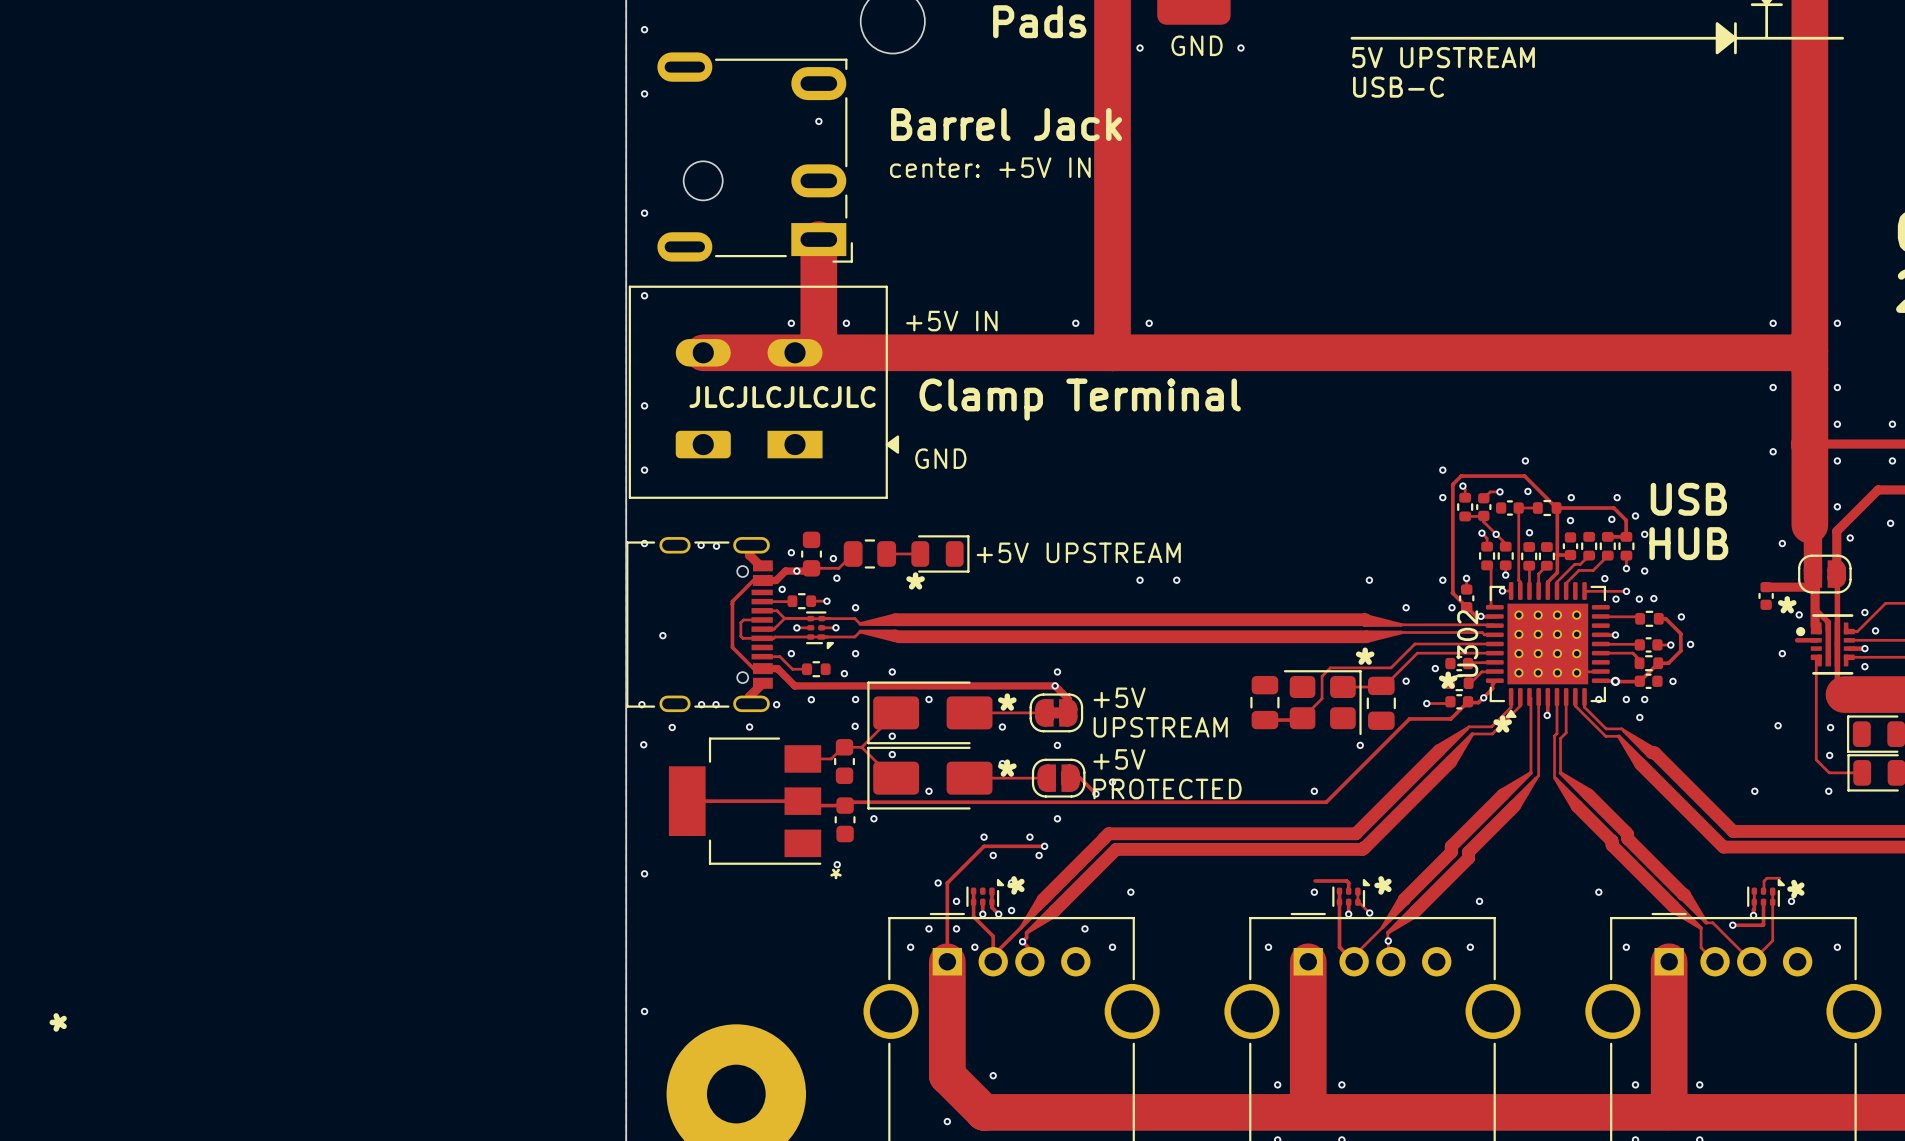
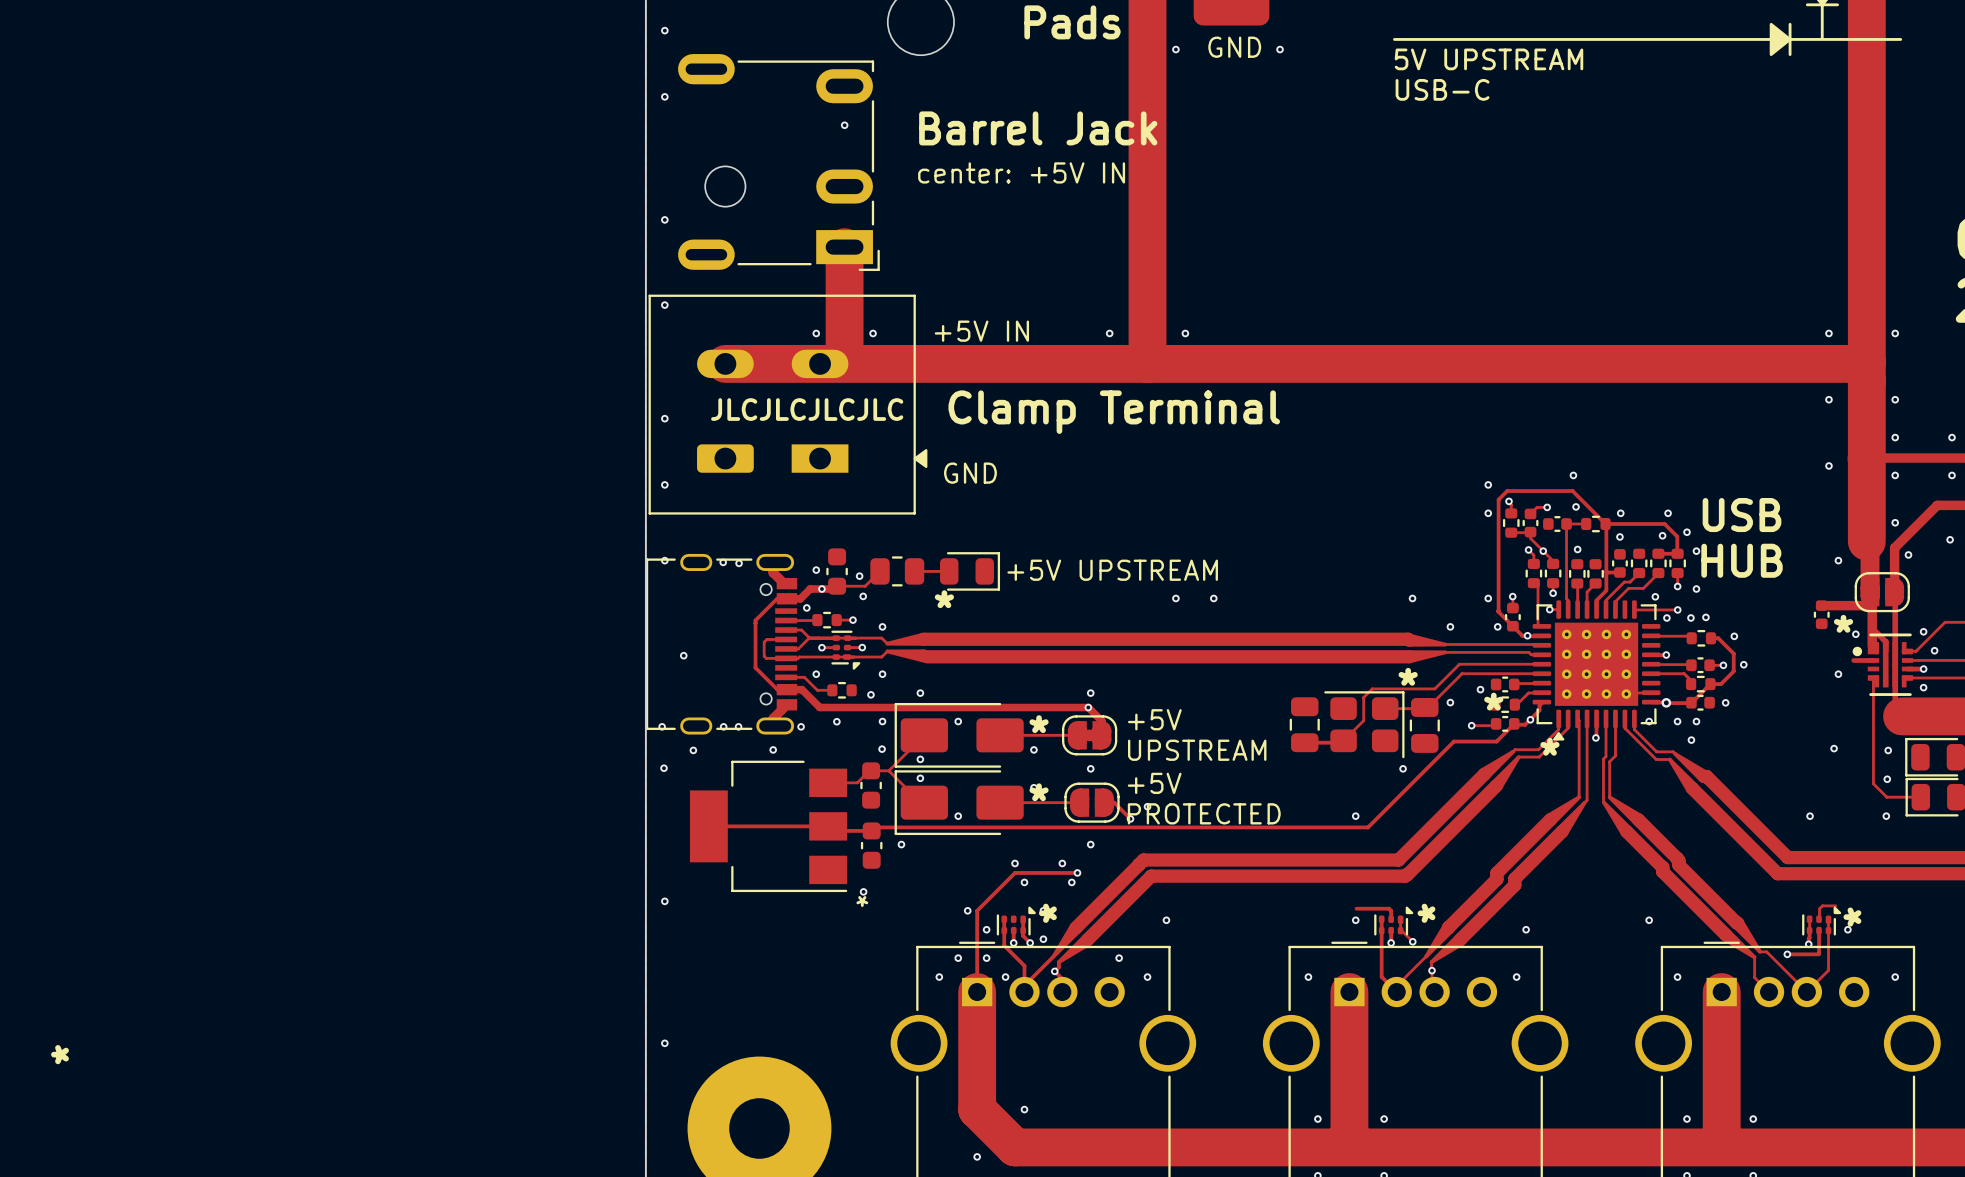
U302: (1547, 650) -> none
part: none -> (1596, 670)

